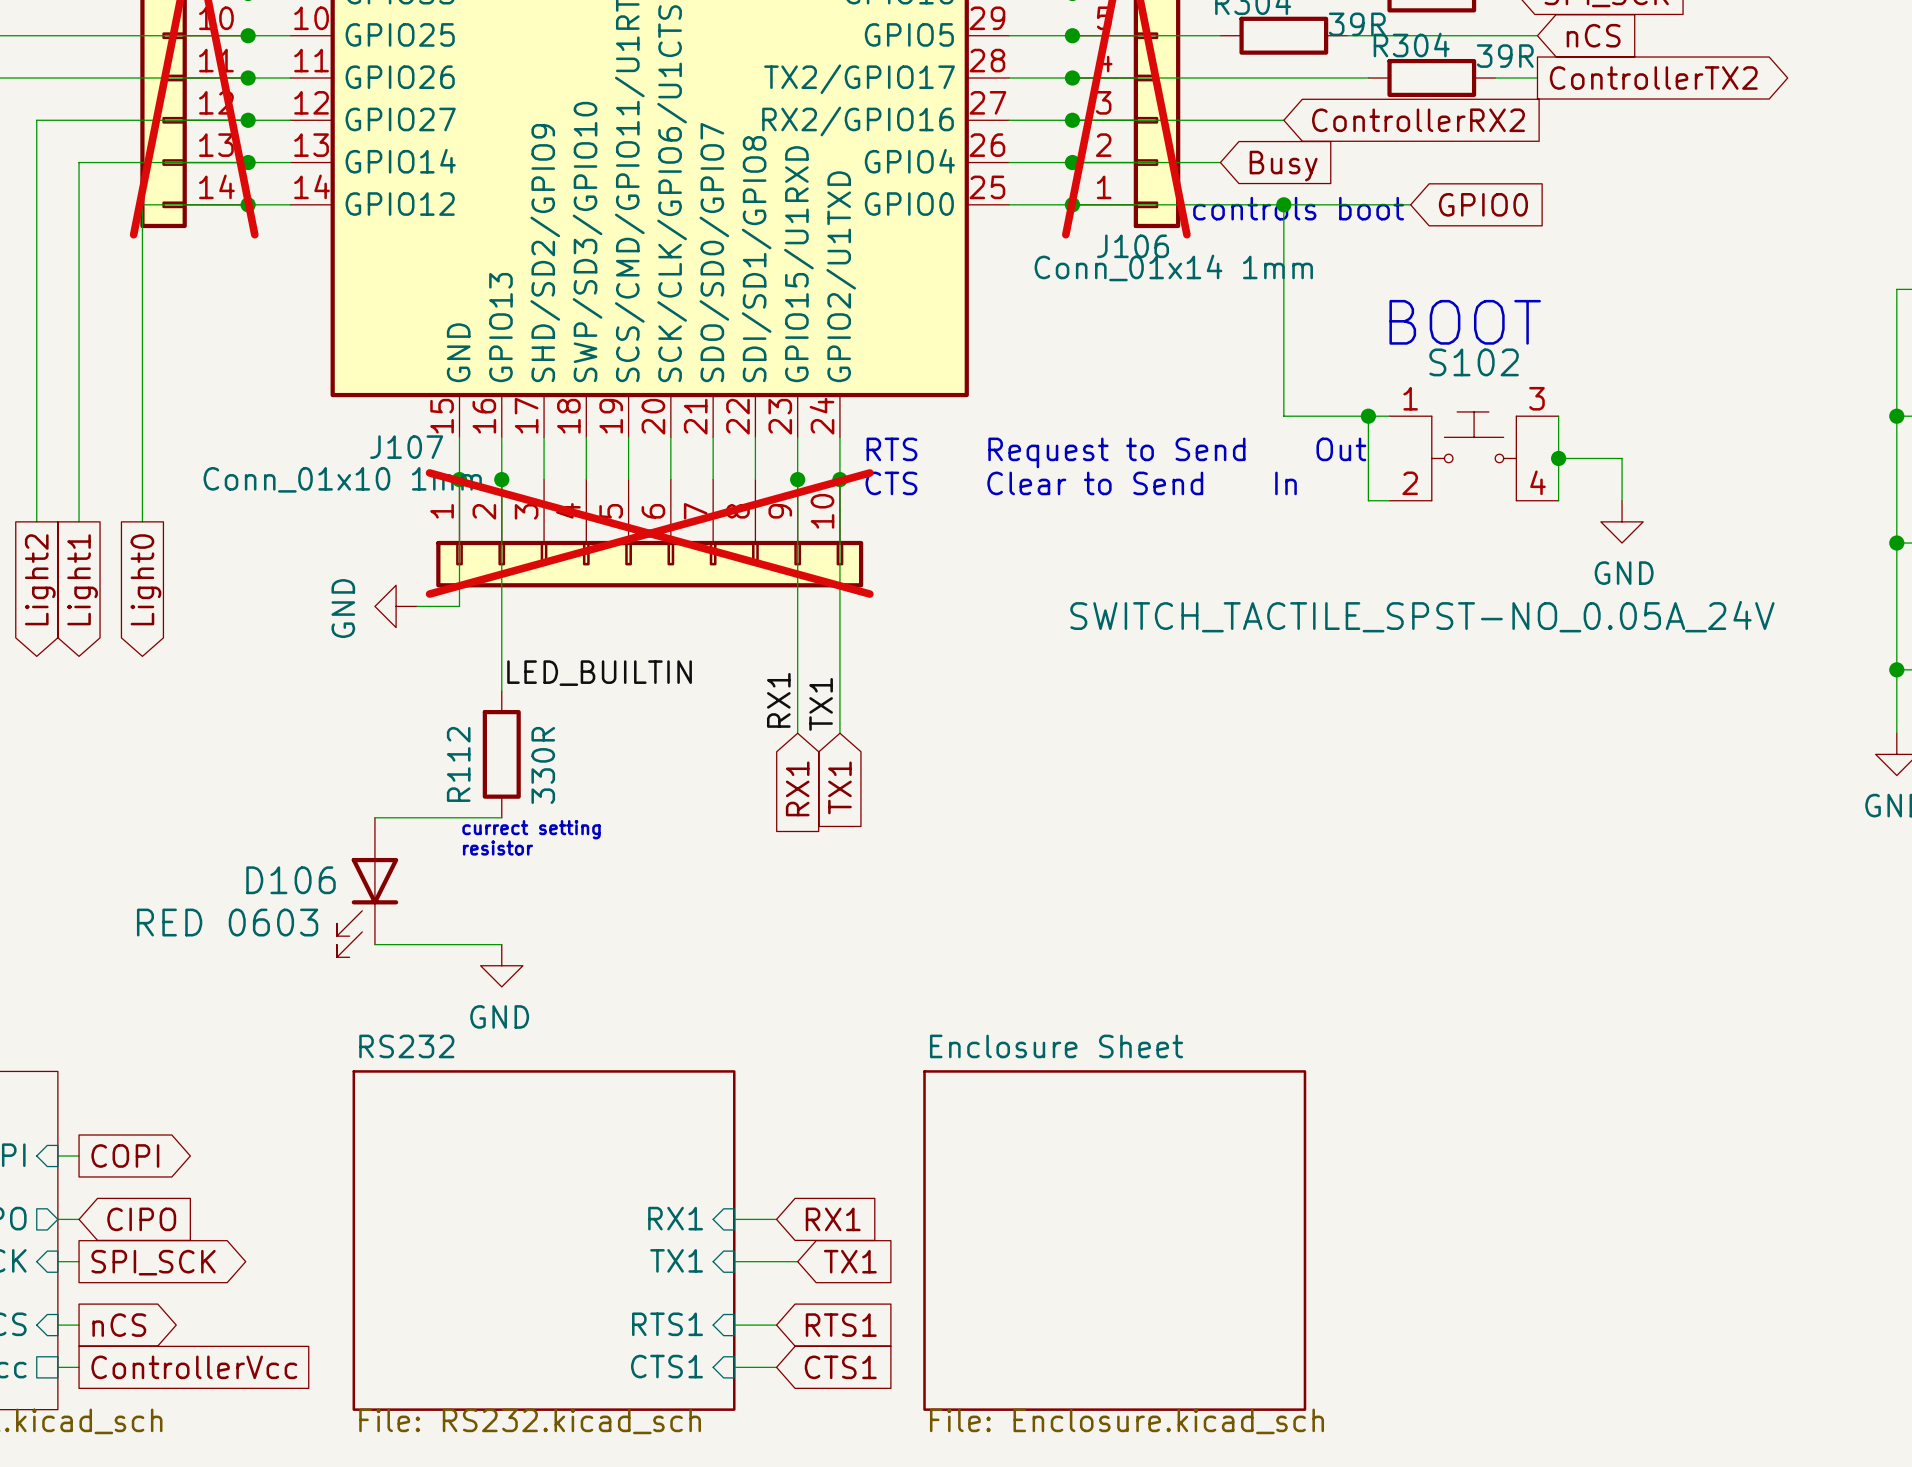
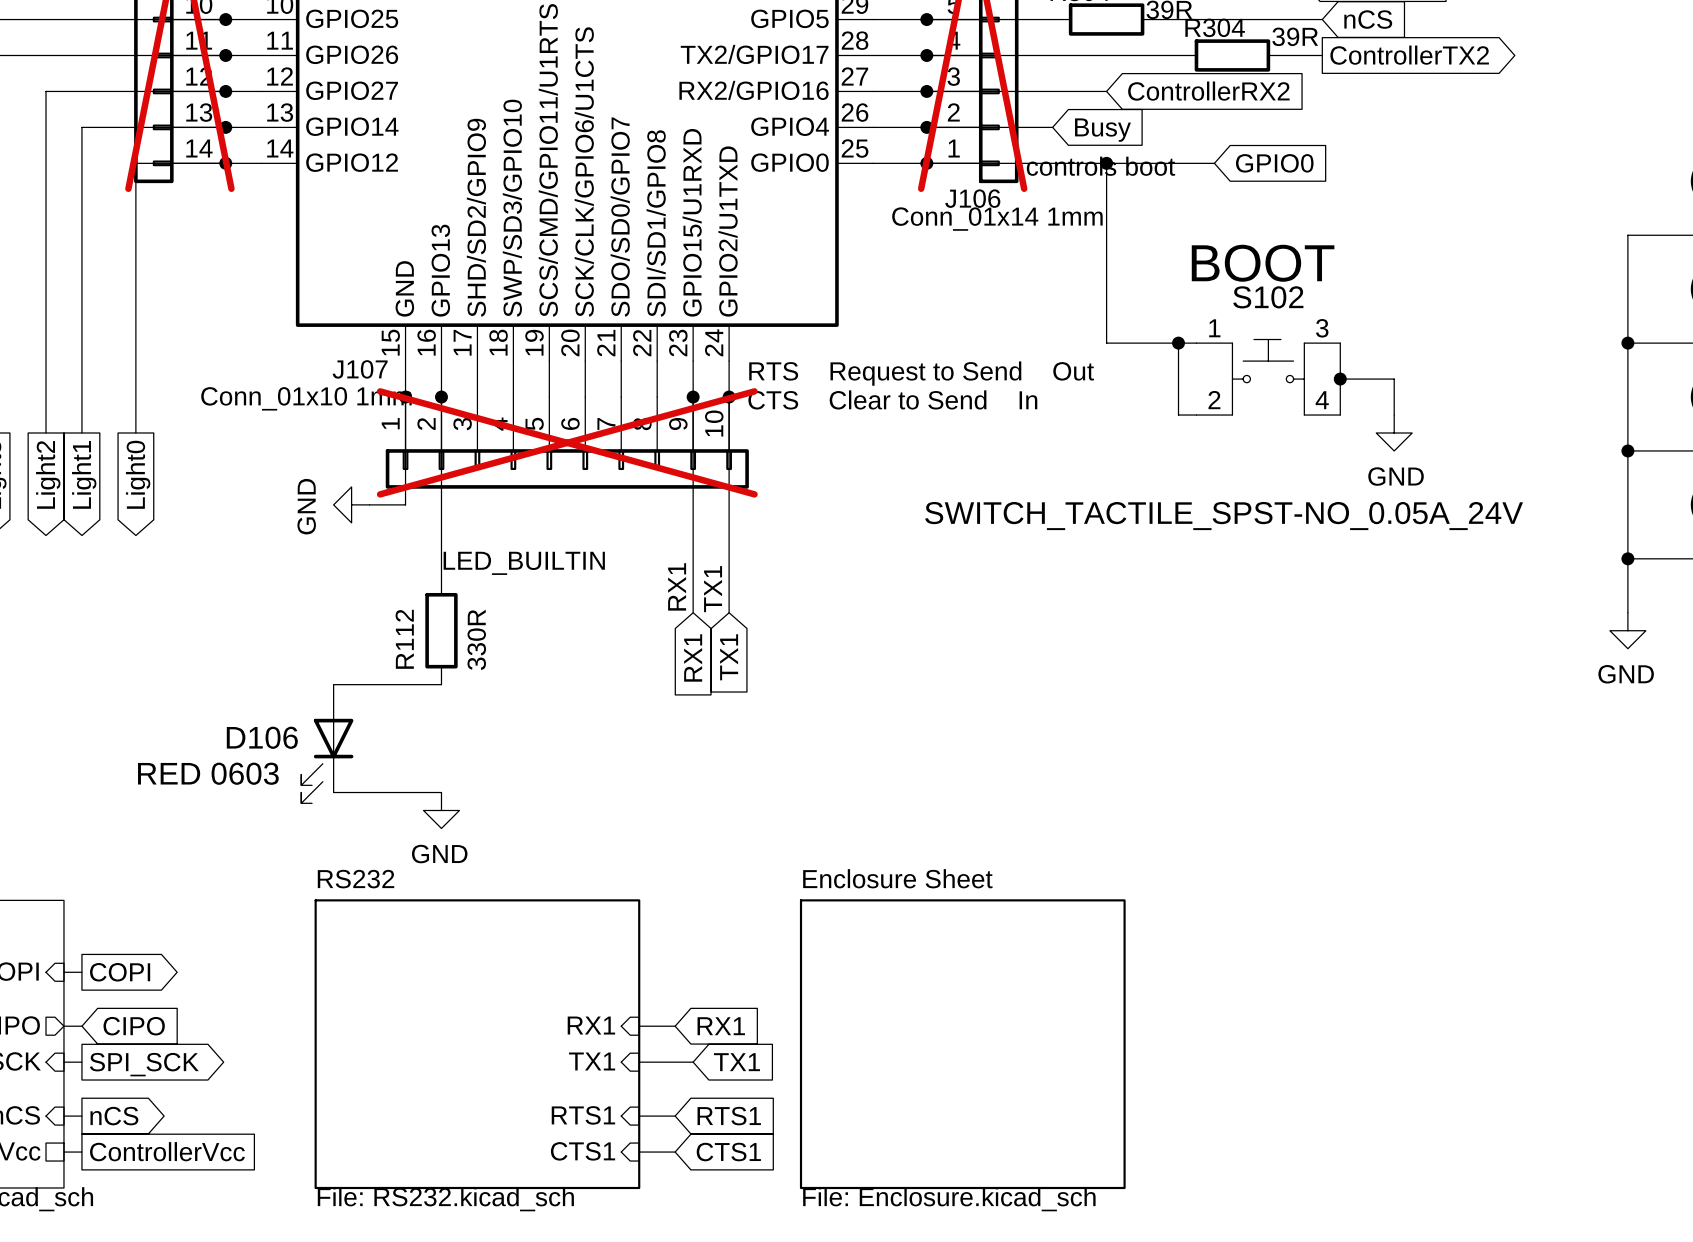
text: currect setting (531, 829) -> none
text: resistor (498, 848) -> none

